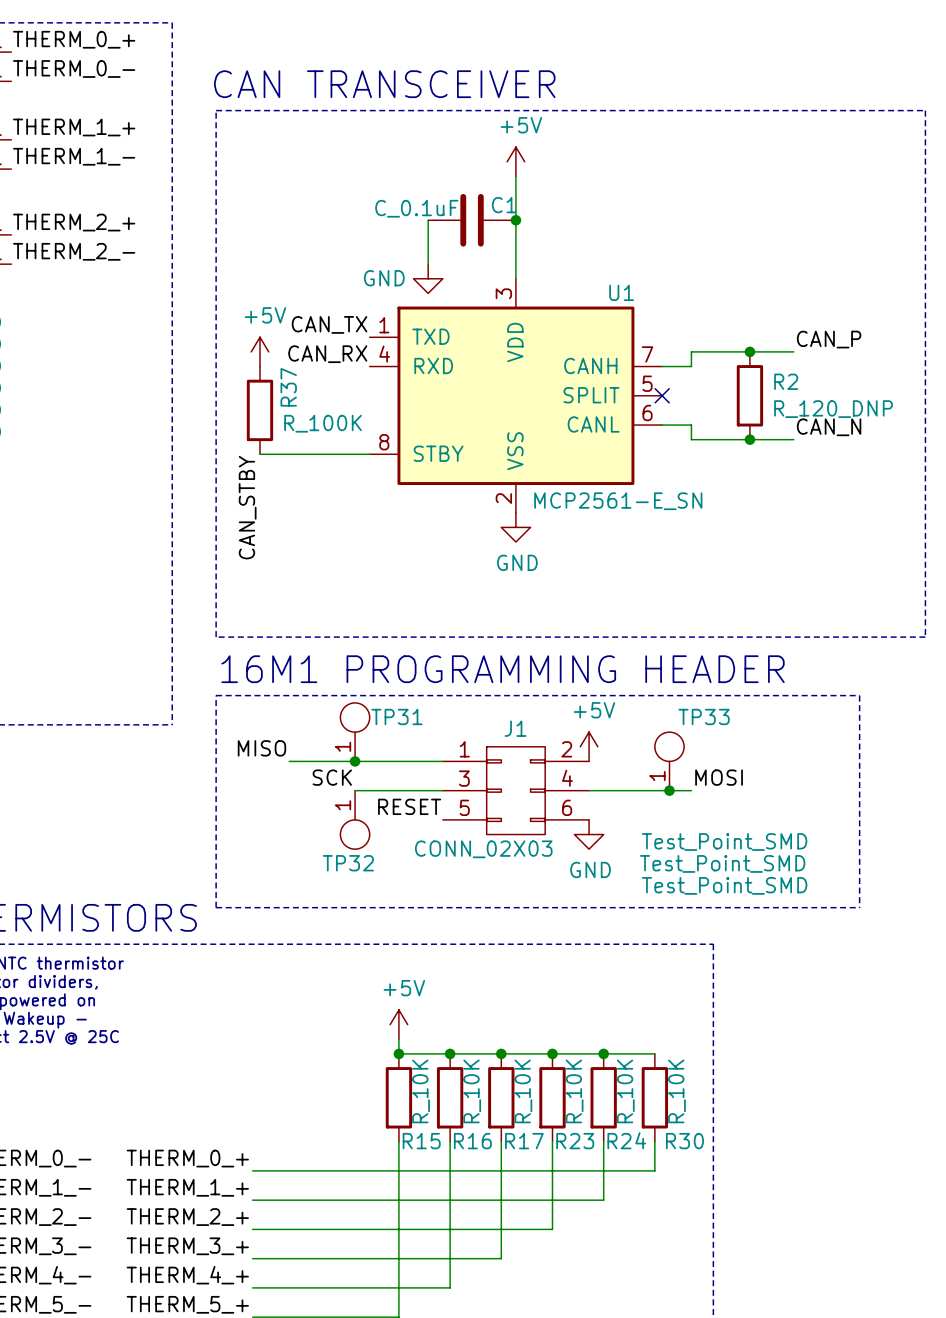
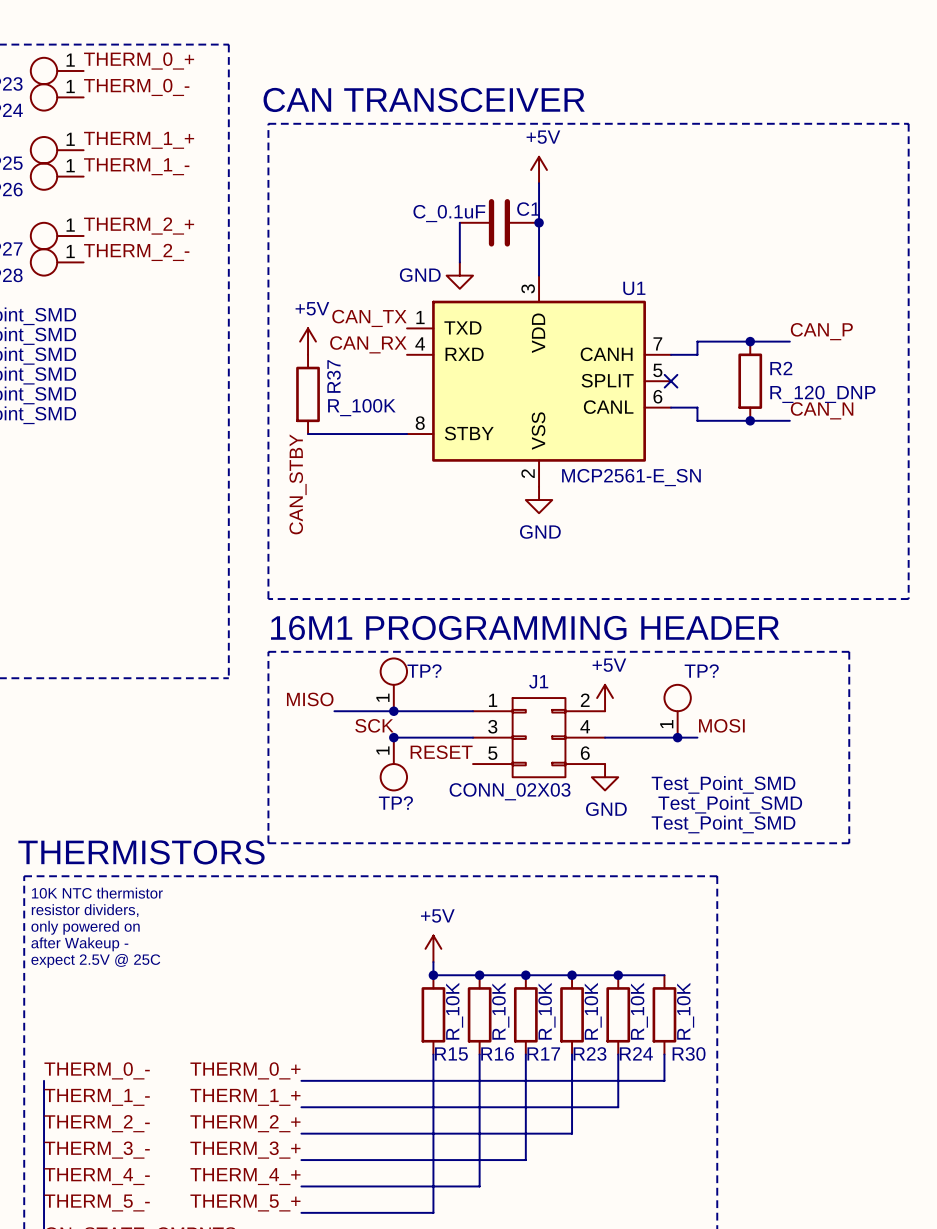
TP31 name: TP31 (396, 716) -> TP? (424, 671)
TP33 name: TP33 (704, 716) -> TP? (701, 671)
junction: none -> (393, 737)
TP32 name: TP32 (348, 863) -> TP? (395, 803)

